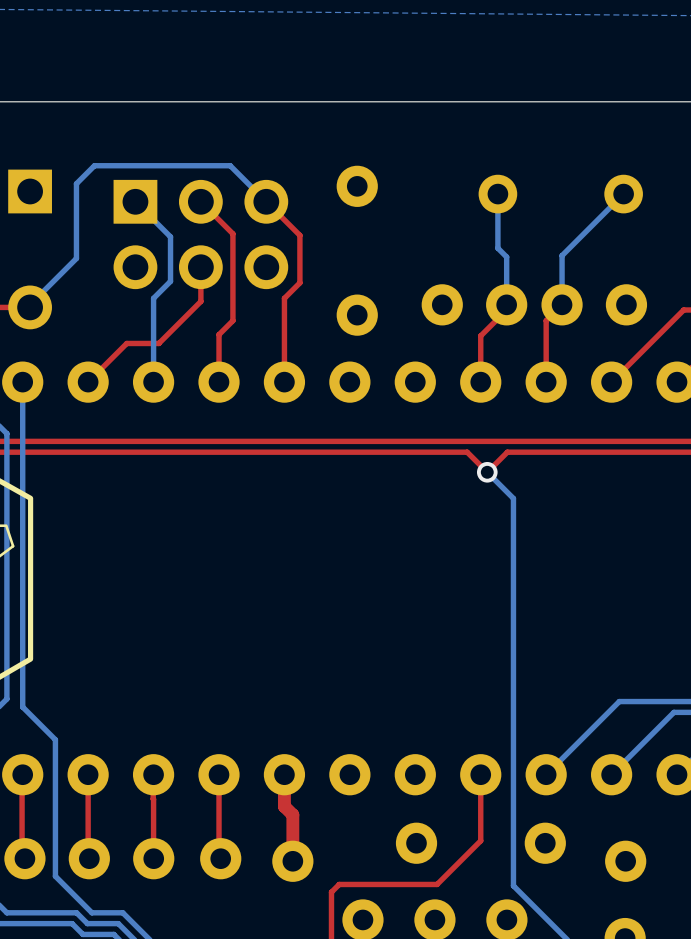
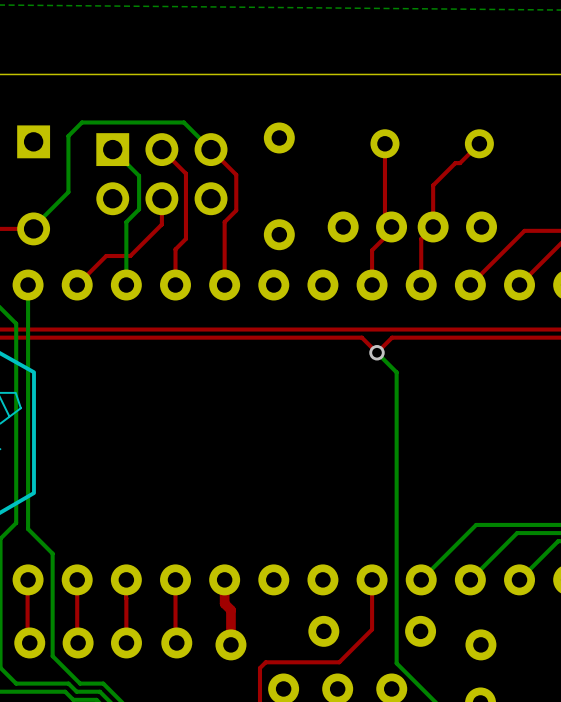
top track: none -> (384, 143) (384, 220) (391, 226)
bottom track: (497, 194) (497, 248) (506, 257) (506, 304) -> none
top track: none -> (479, 143) (460, 163) (455, 163) (433, 185) (433, 226)
bottom track: (623, 194) (562, 255) (562, 304) -> none

